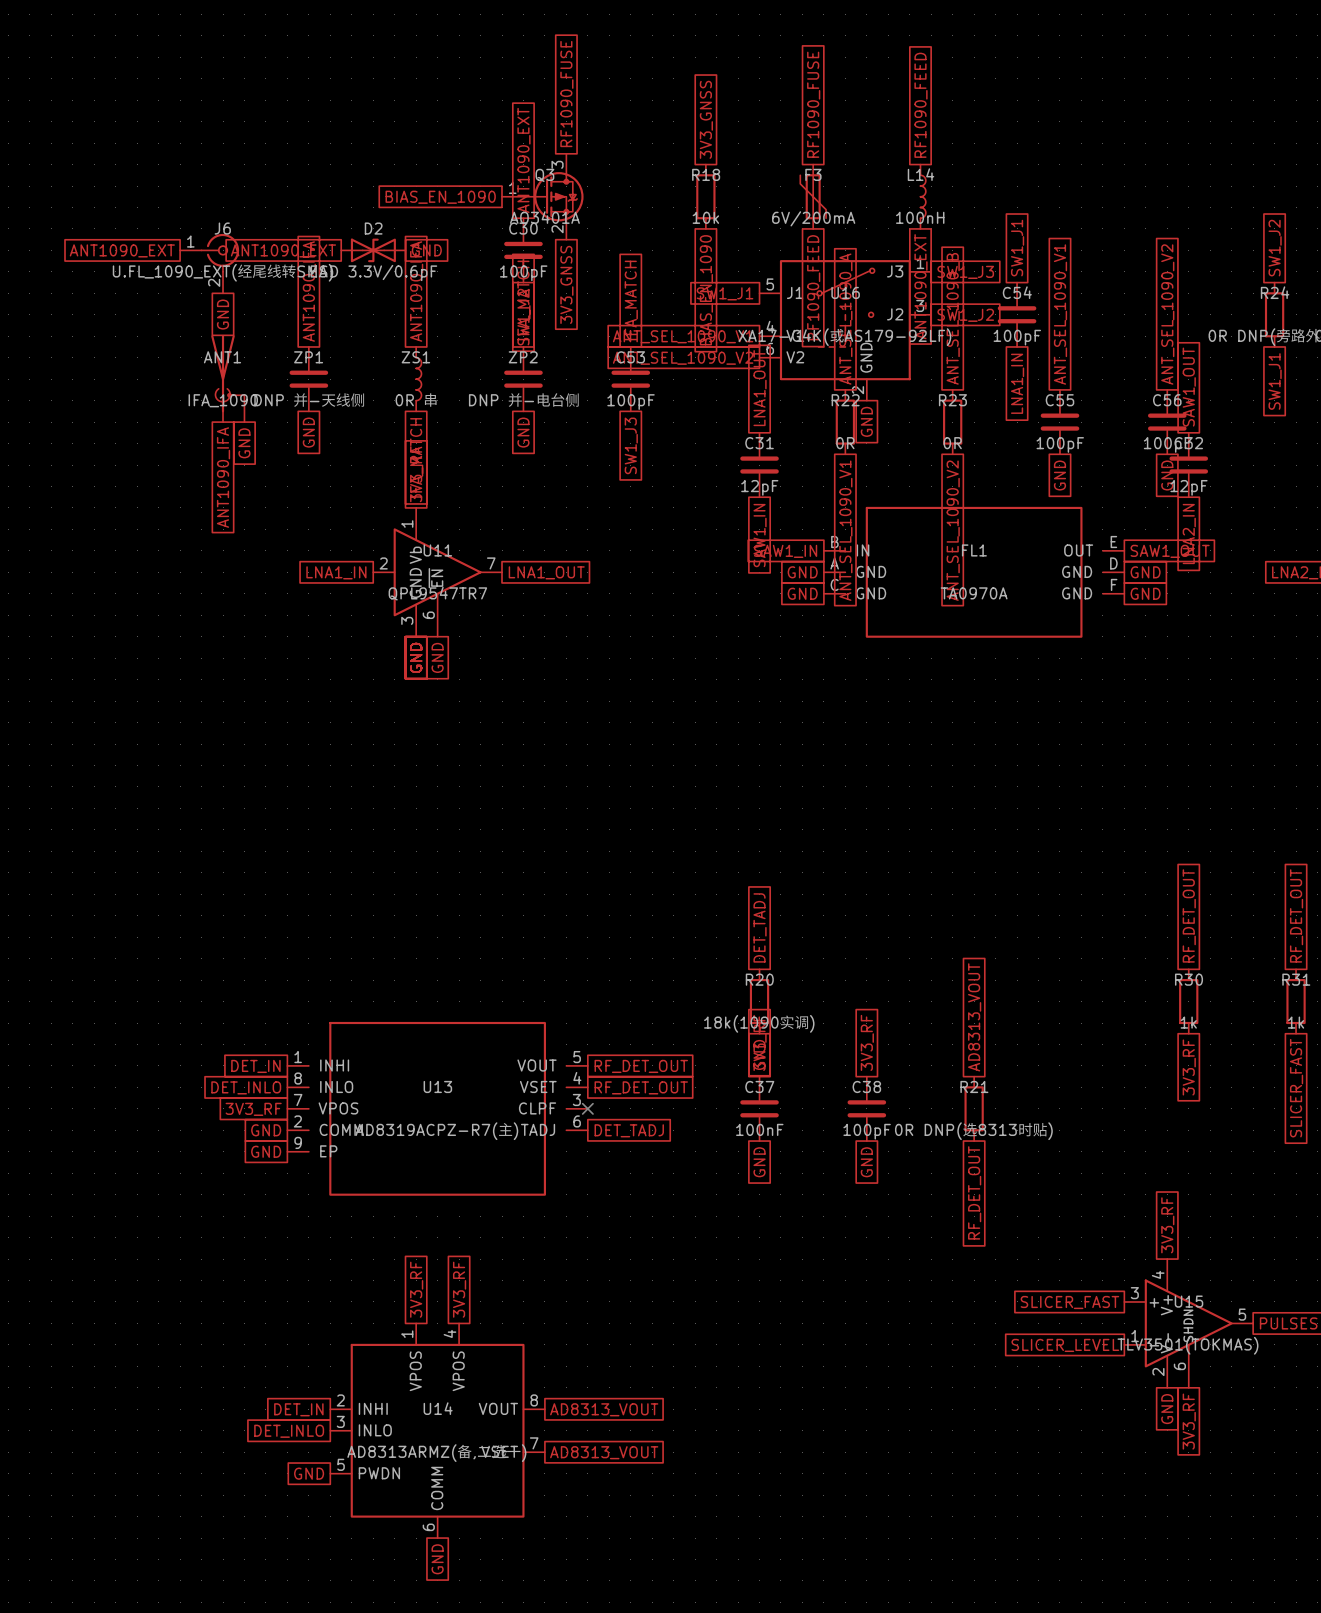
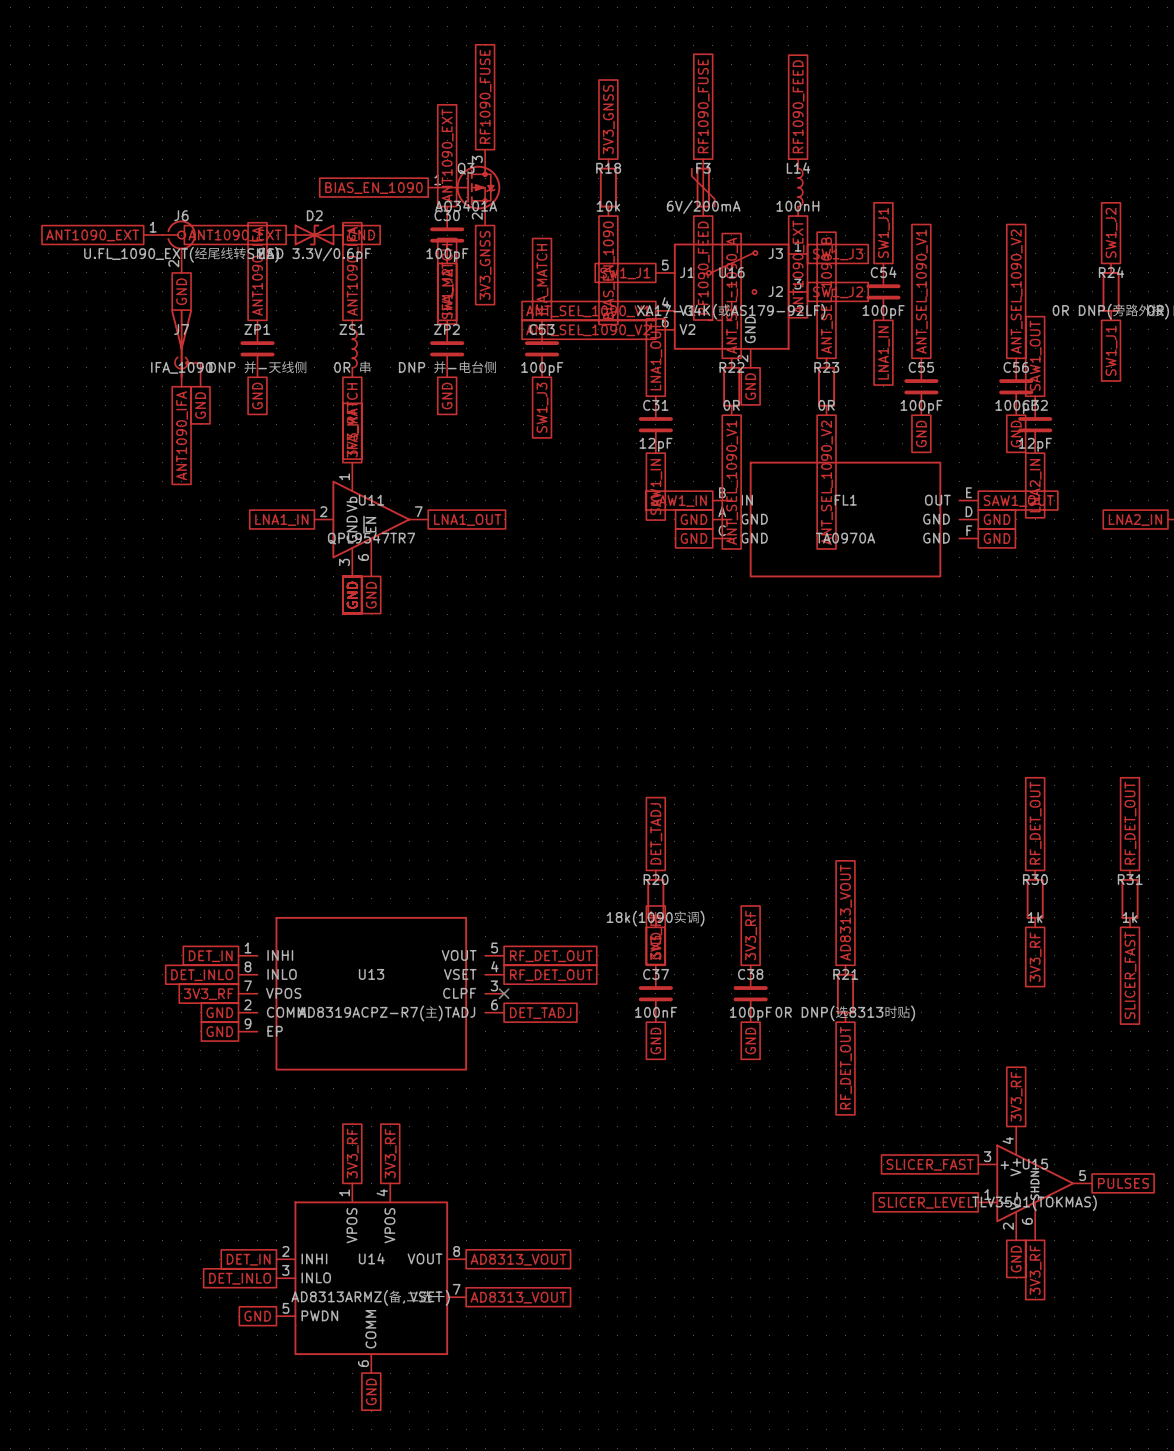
ANT1 name: ANT1 (222, 357) -> J7 (181, 329)

